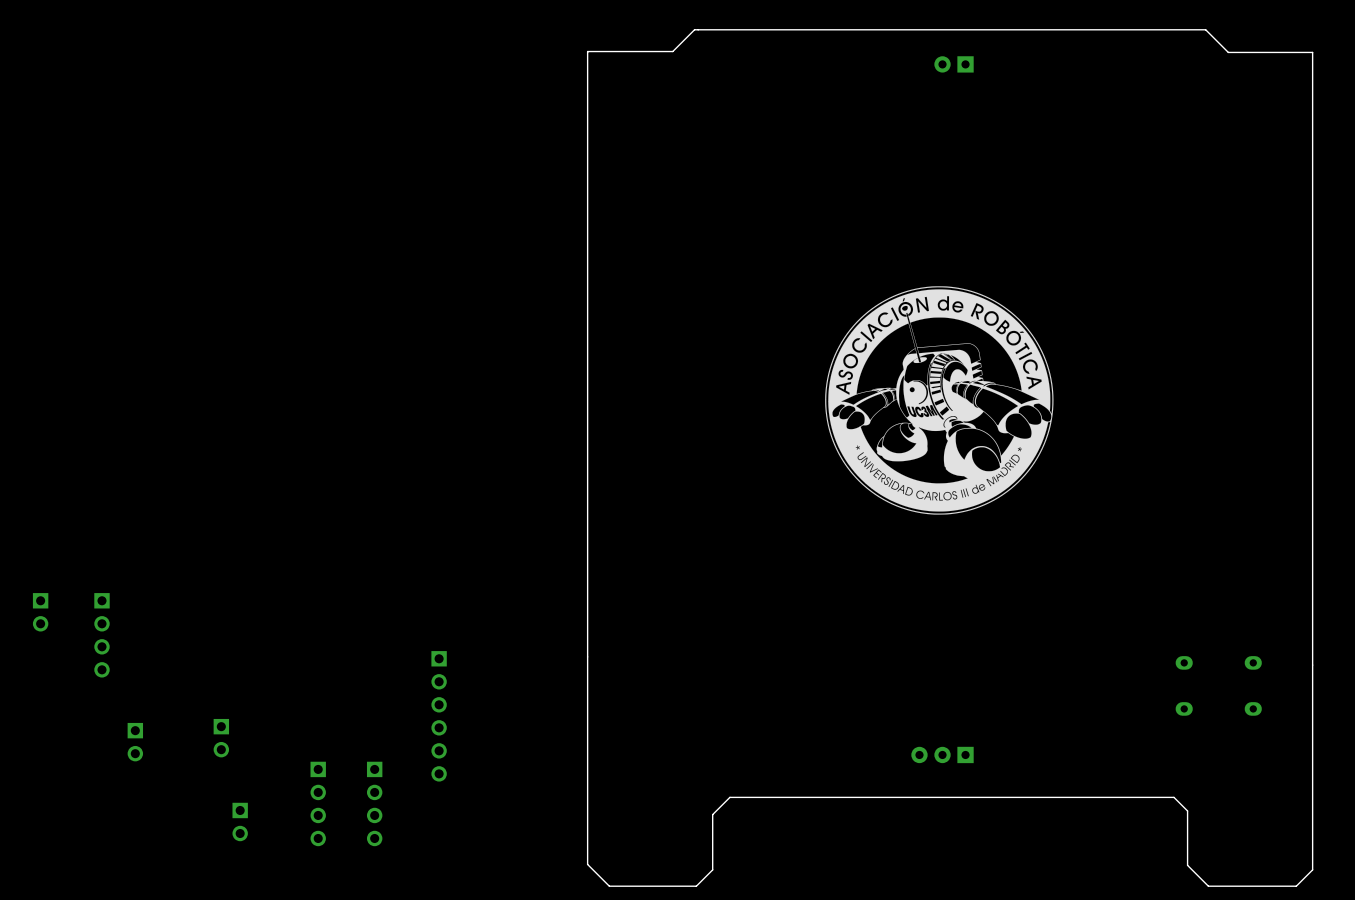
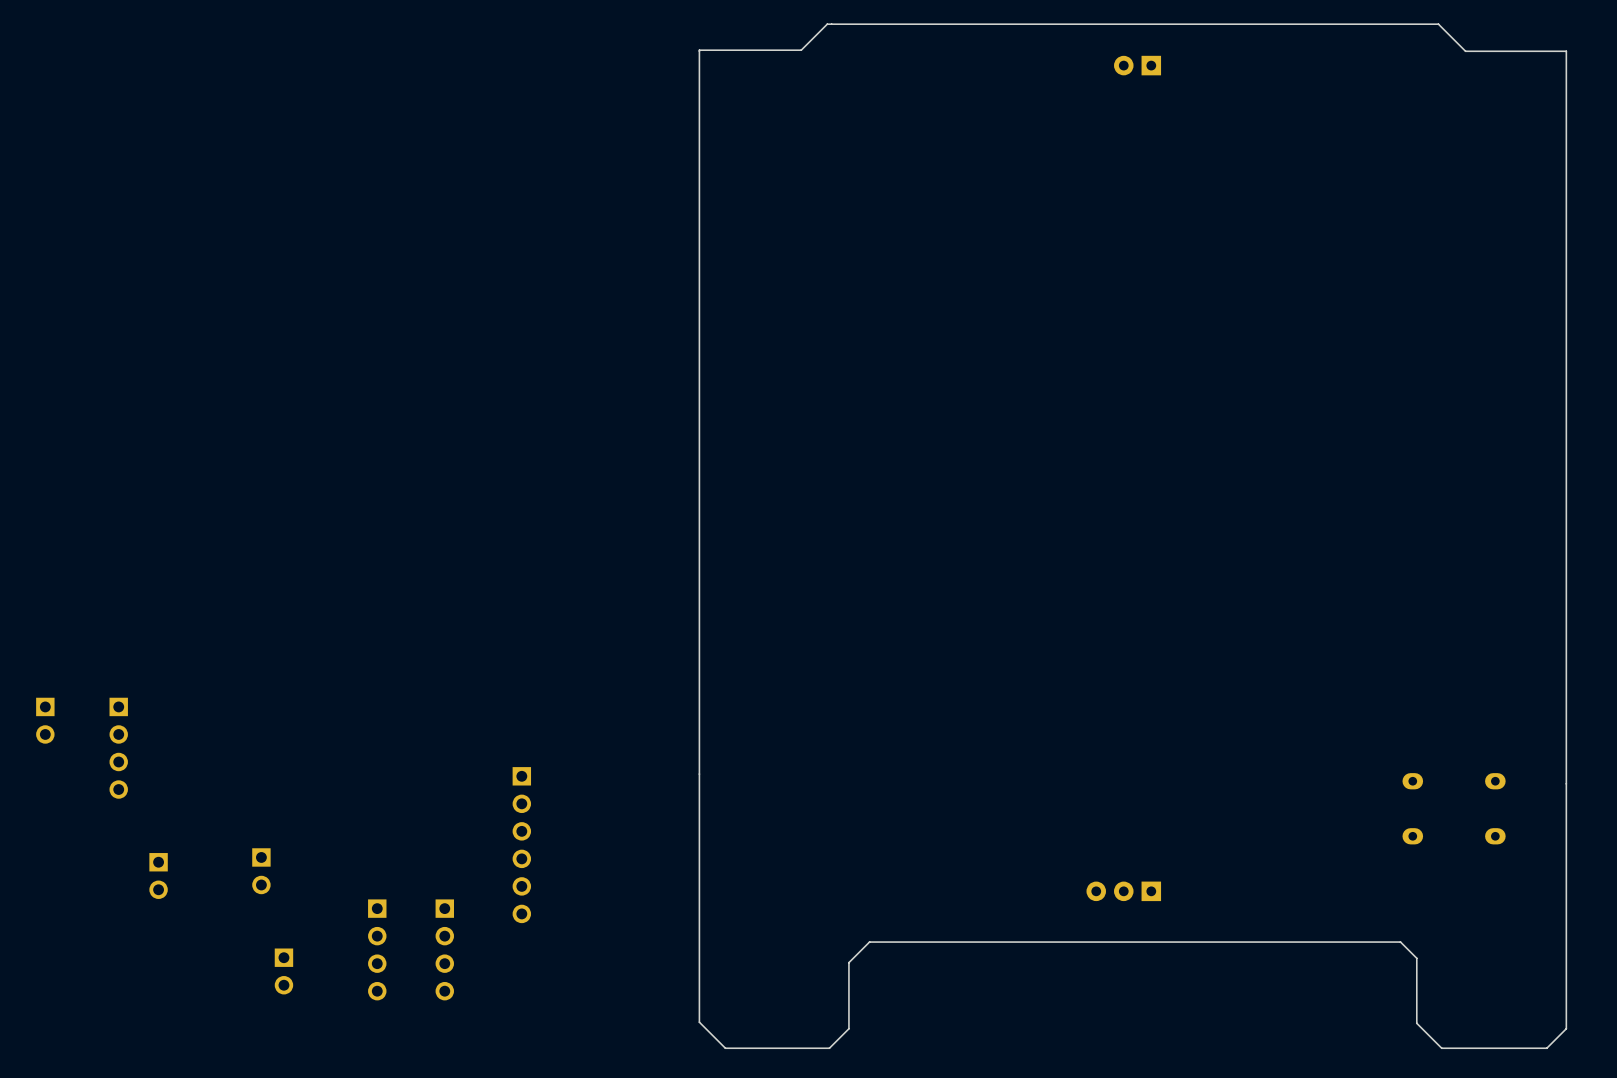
drawing: [825, 286, 1054, 515] -> none

